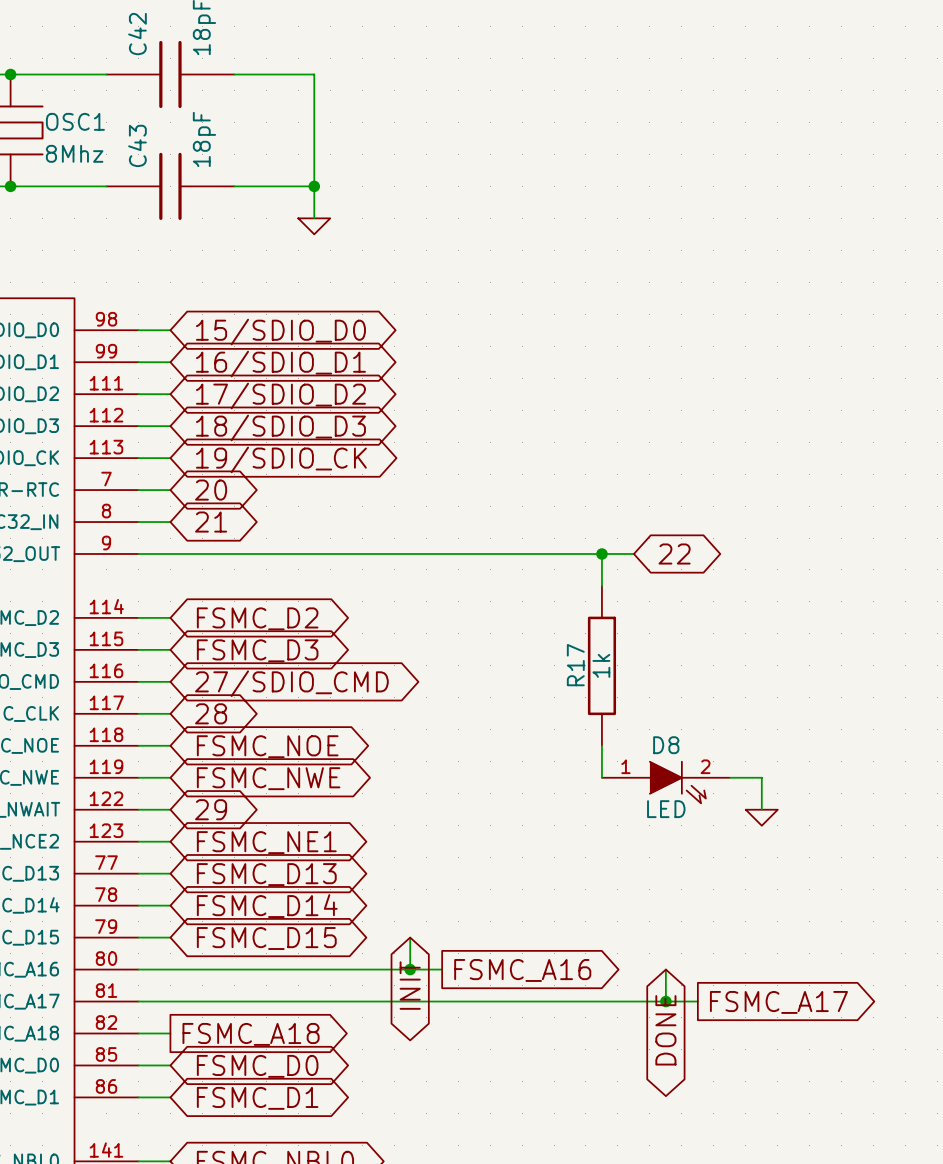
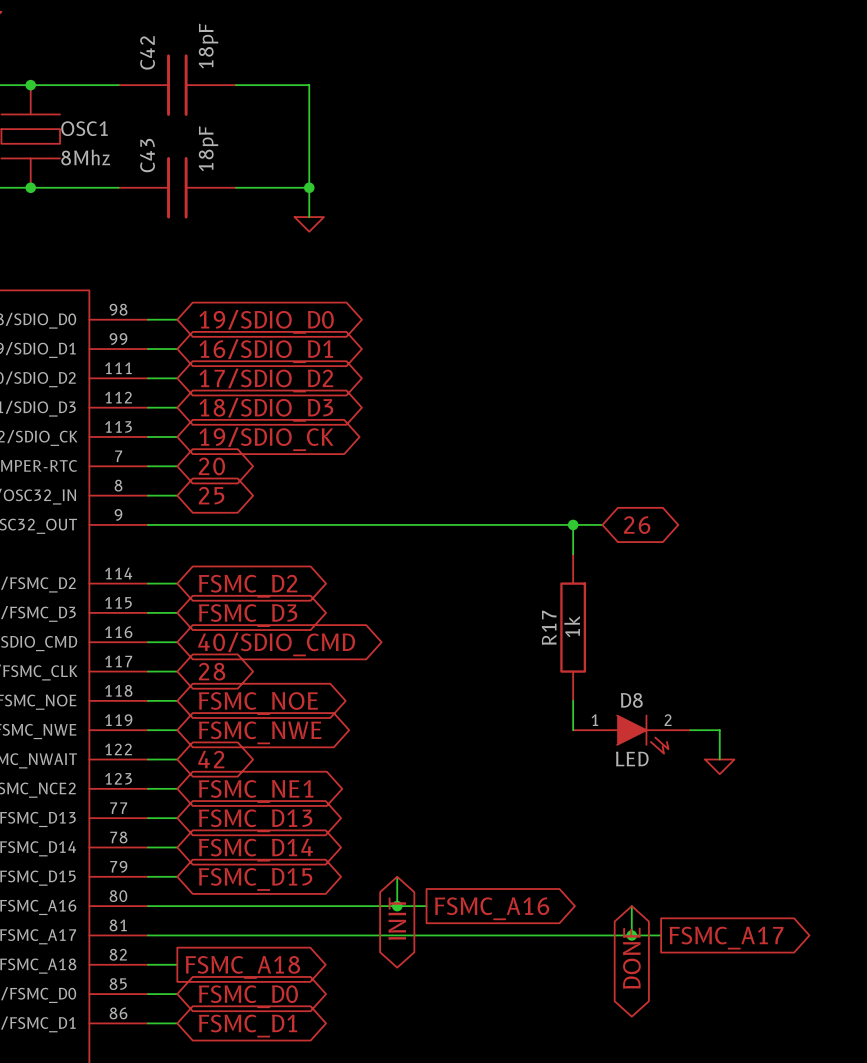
global label: 15/SDIO_D0 (280, 332) -> 19/SDIO_D0 (266, 321)
global label: 21 (211, 522) -> 25 (211, 495)
global label: 22 (674, 554) -> 26 (637, 525)
global label: 27/SDIO_CMD (291, 683) -> 40/SDIO_CMD (276, 644)
global label: 29 (211, 809) -> 42 (211, 759)

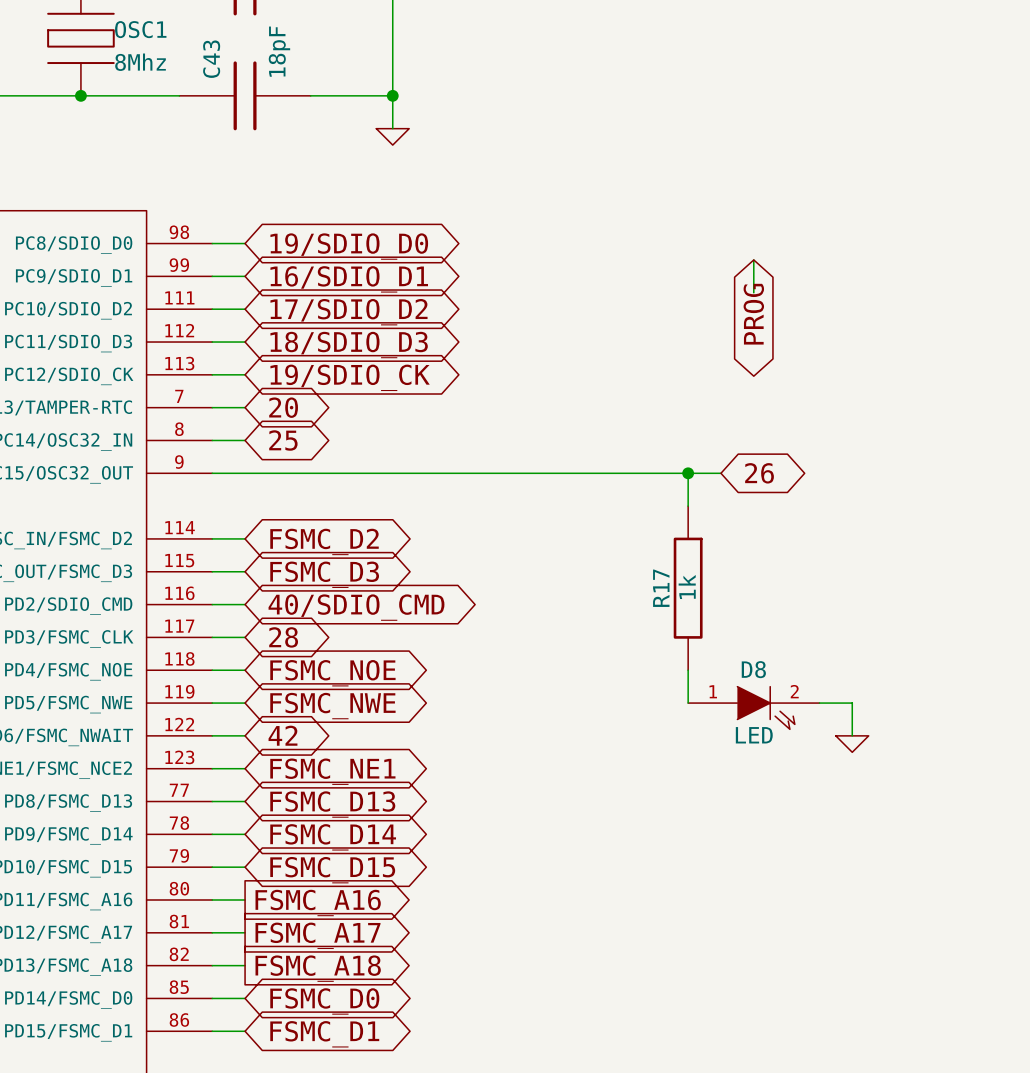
wire: none -> (753, 259) (753, 292)
global label: none -> PROG (753, 314)
wire: (397, 876) (397, 906) -> none
wire: (177, 906) (426, 906) -> none
junction: (397, 906) -> none
wire: (631, 906) (631, 935) -> none
global label position: FSMC_A16 (492, 908) -> FSMC_A16 (318, 903)
global label: INIT (397, 918) -> none
wire: (177, 935) (661, 935) -> none
junction: (631, 935) -> none
global label: none -> FSMC_A17 (318, 935)
global label: FSMC_A17 (726, 938) -> none
global label: DONE (631, 958) -> none

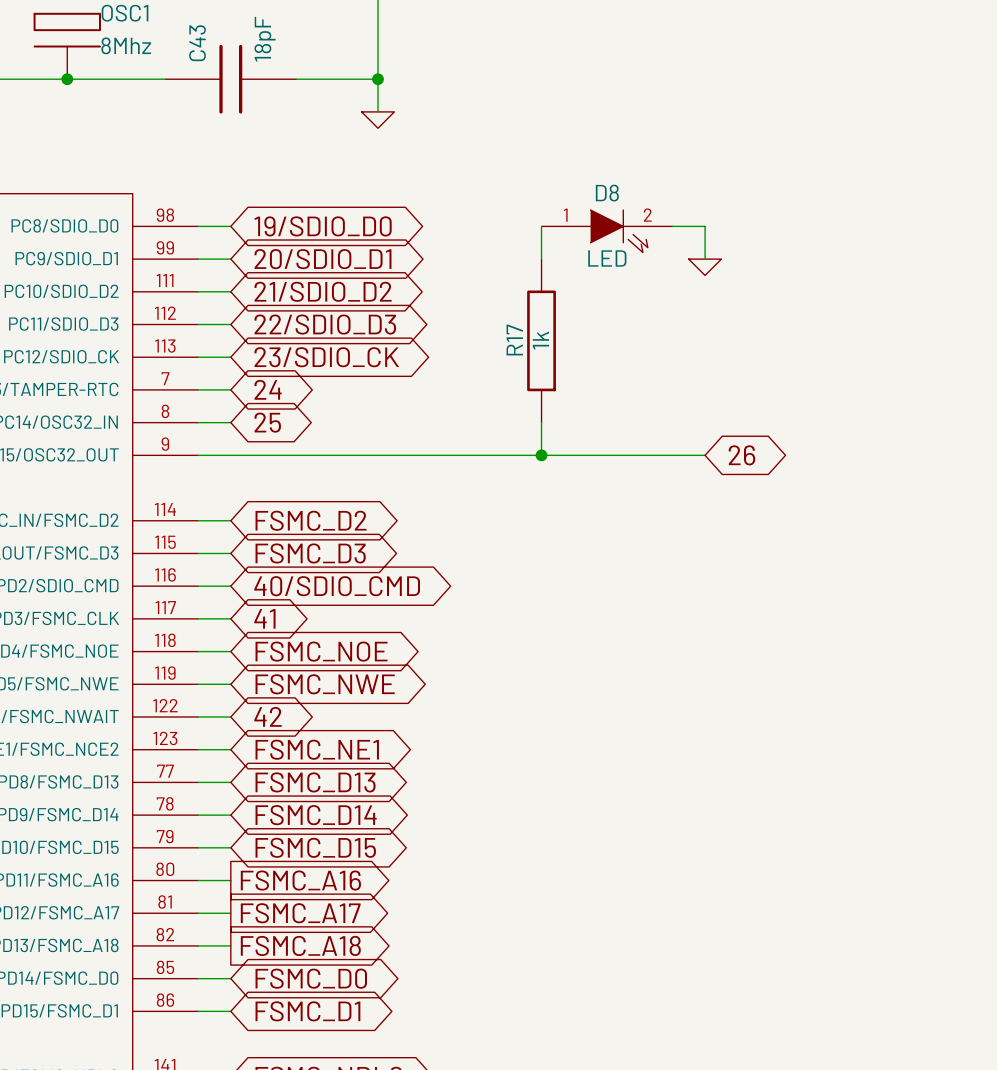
wire: none -> (672, 226) (705, 226) (705, 259)
wire: (753, 259) (753, 292) -> none
global label: 16/SDIO_D1 (349, 279) -> 20/SDIO_D1 (322, 259)
power symbol: none -> (705, 267)
global label: 17/SDIO_D2 (348, 312) -> 21/SDIO_D2 (323, 291)
global label: PROG (753, 314) -> none
global label: 18/SDIO_D3 (349, 345) -> 22/SDIO_D3 (325, 324)
global label: 19/SDIO_CK (350, 377) -> 23/SDIO_CK (326, 357)
global label: 20 (283, 407) -> 24 (268, 389)
junction: none -> (541, 455)
wire: (688, 473) (688, 506) -> (541, 226) (541, 259)
junction: (688, 473) -> none
R17 position: (688, 588) -> (541, 340)
global label: 28 (283, 637) -> 41 (264, 618)
wire: (688, 670) (688, 703) -> (541, 422) (541, 455)
wire: (819, 703) (852, 703) (852, 735) -> none
D8 position: (753, 707) -> (606, 231)
power symbol: (852, 744) -> none

